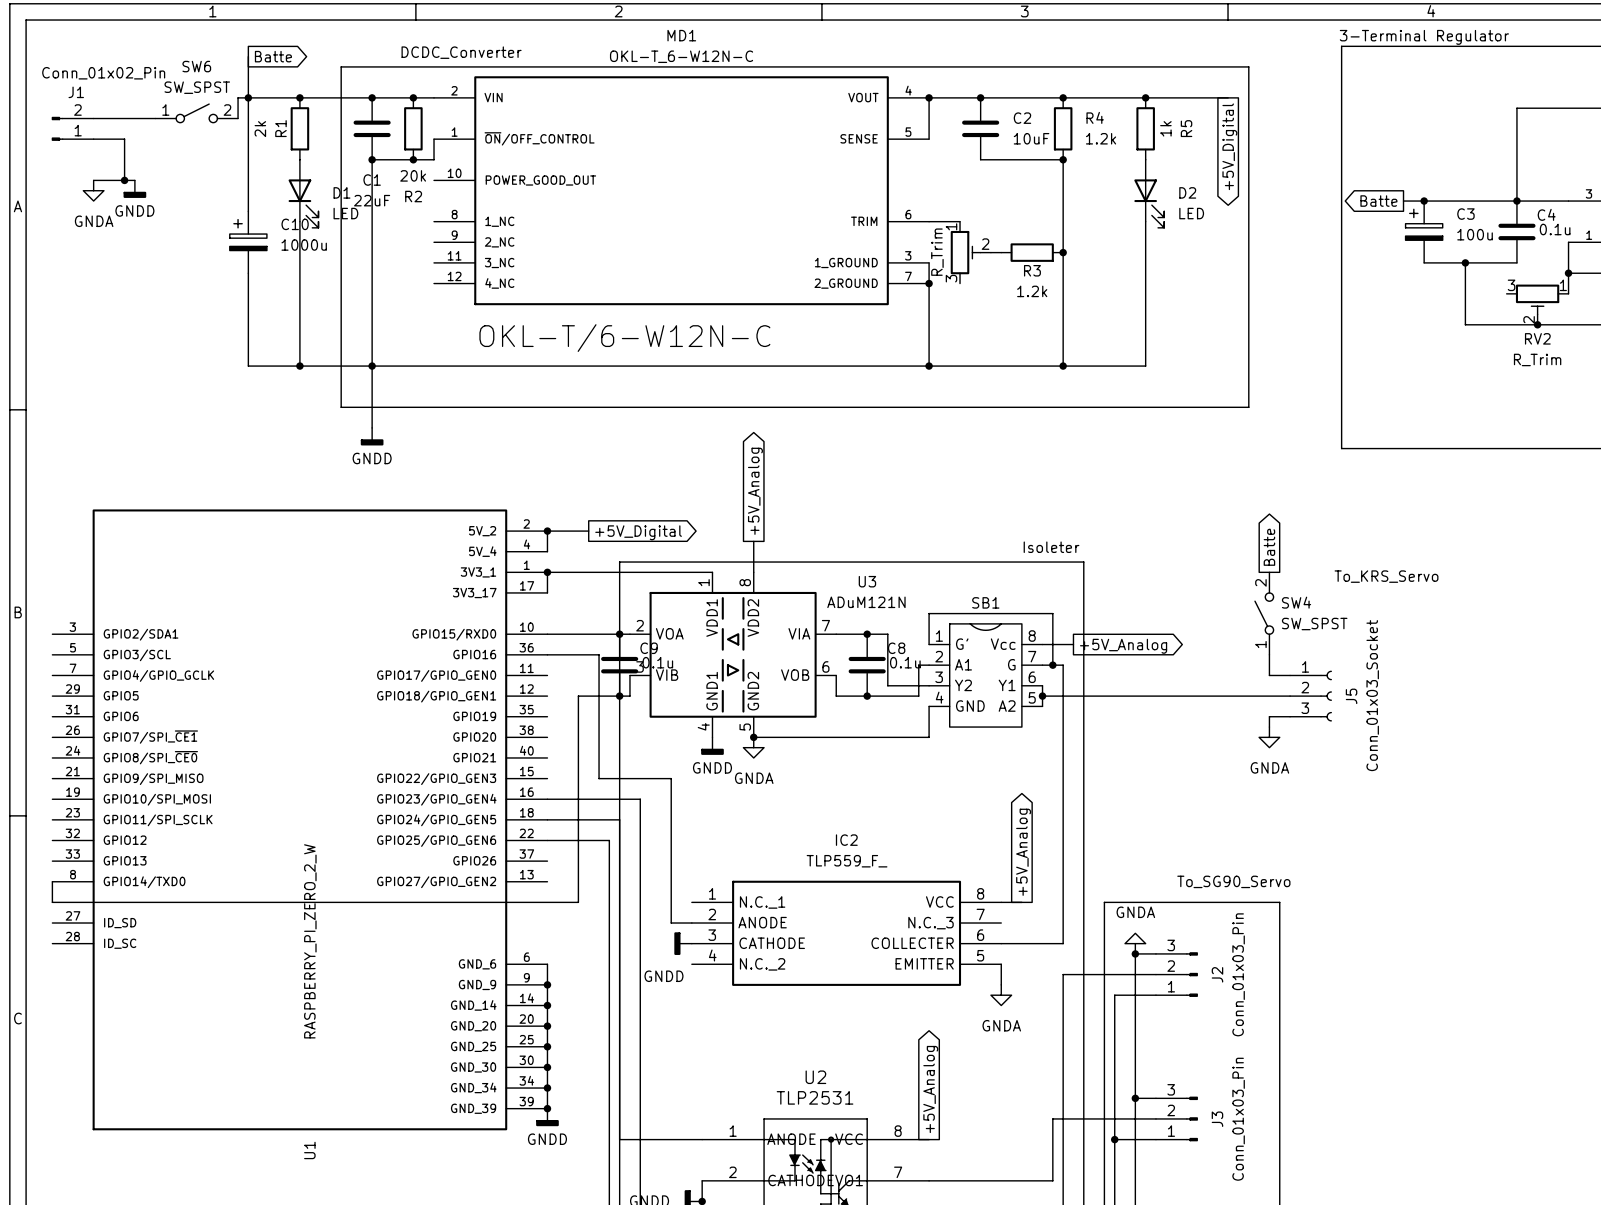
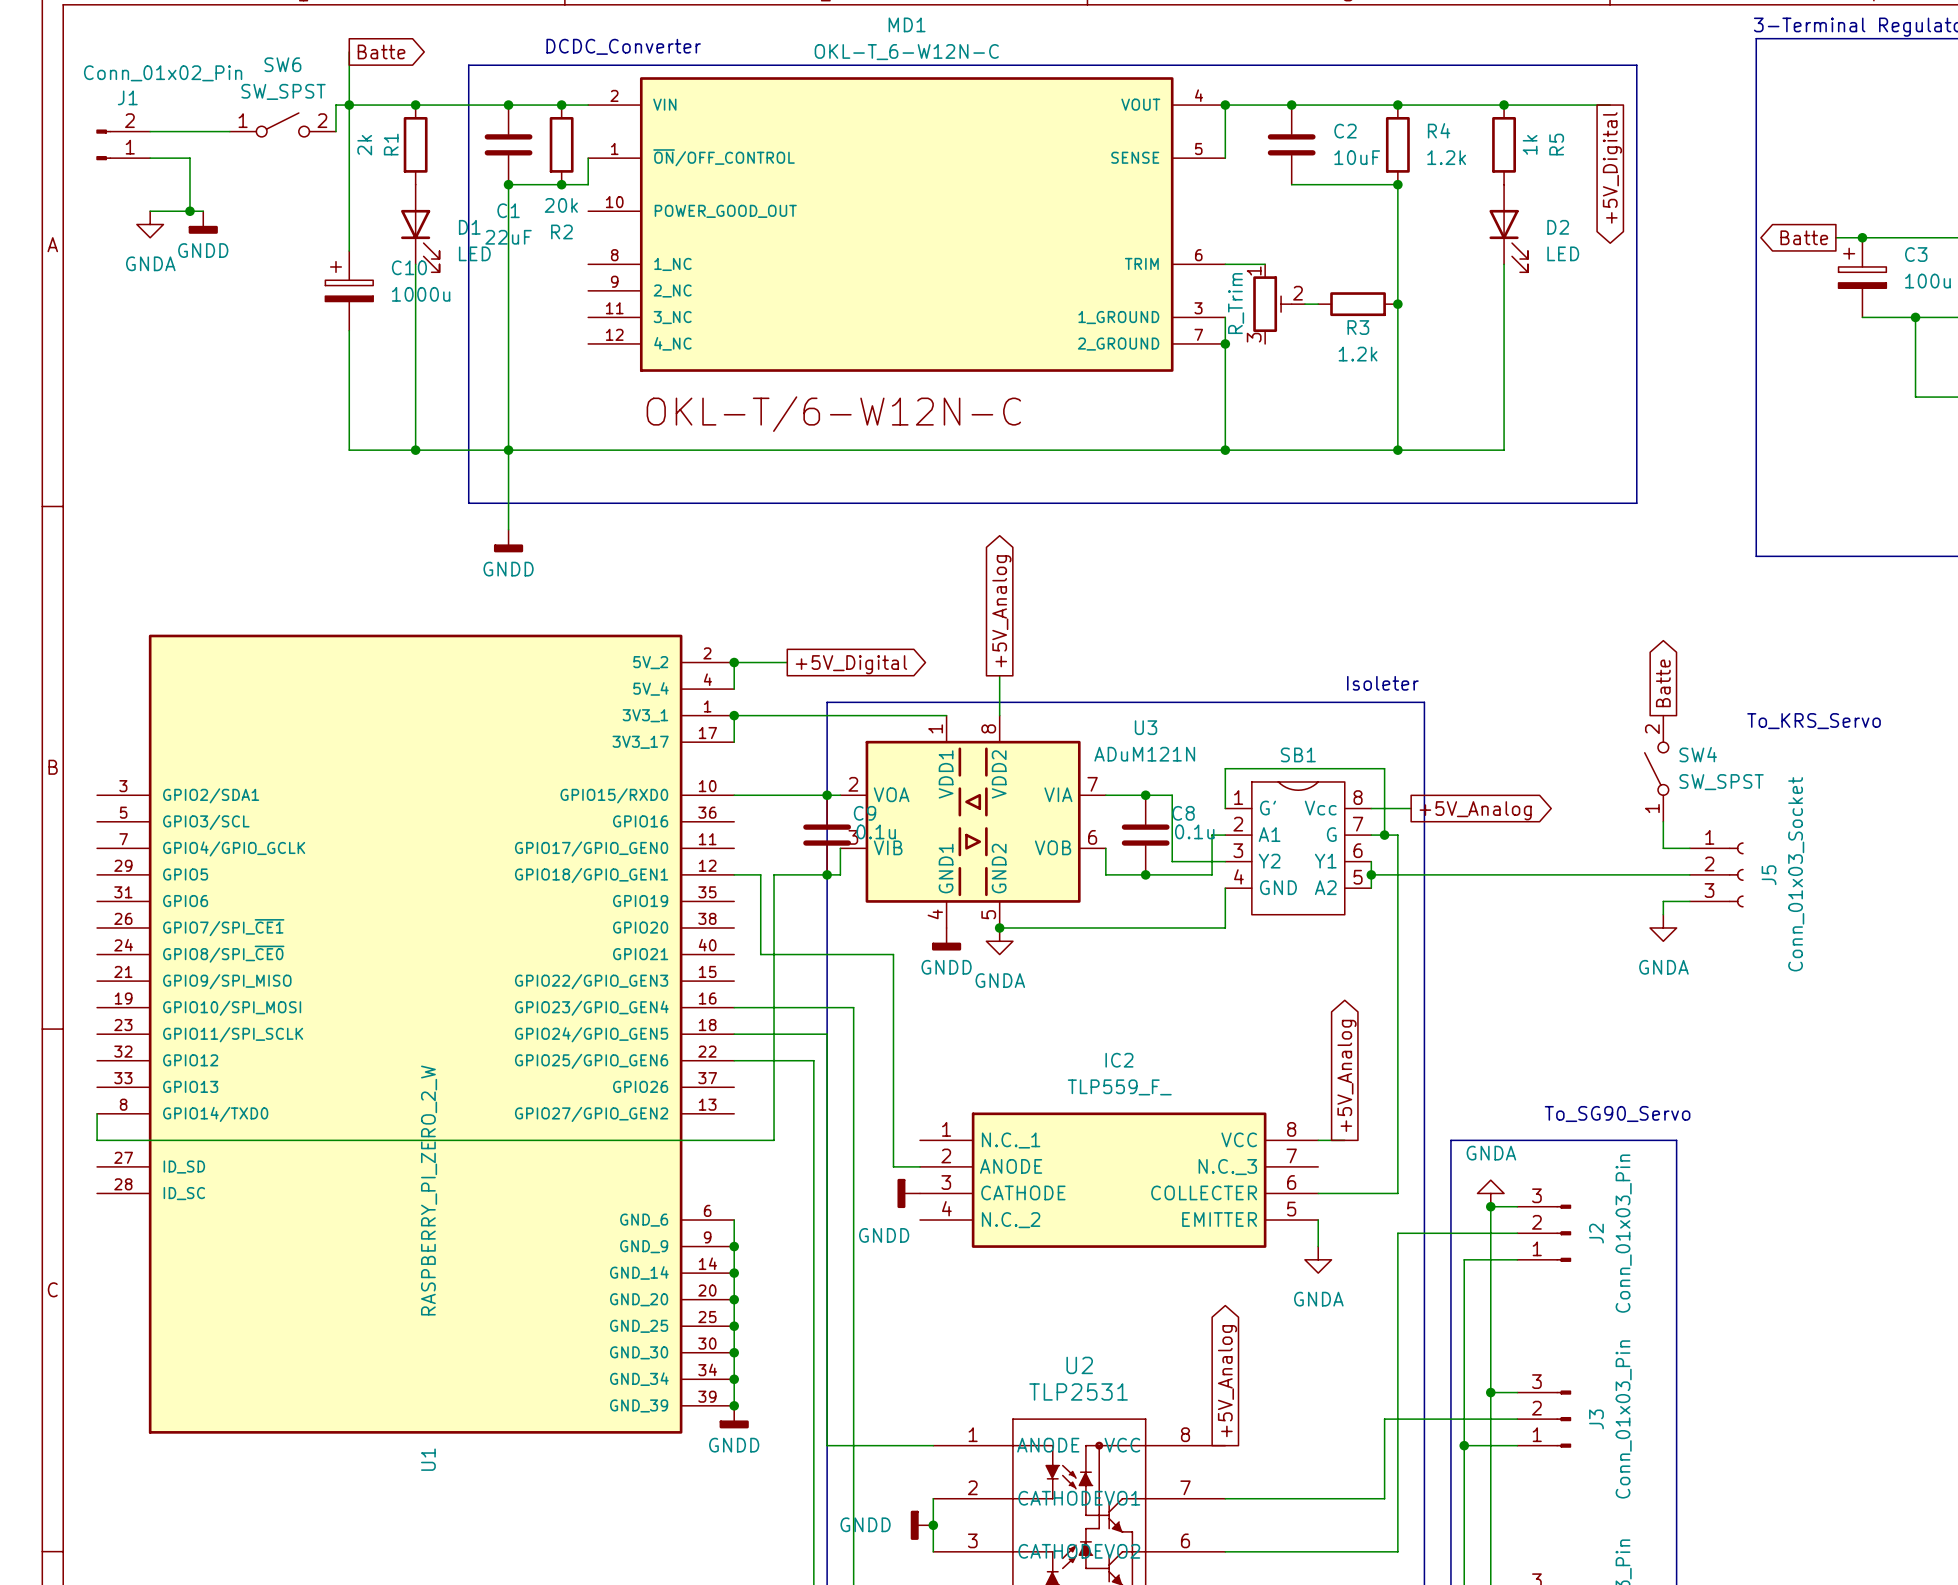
wire: (547, 654) (599, 654) (599, 778) (671, 778) -> (734, 874) (760, 874) (760, 954) (893, 954) (893, 981)

